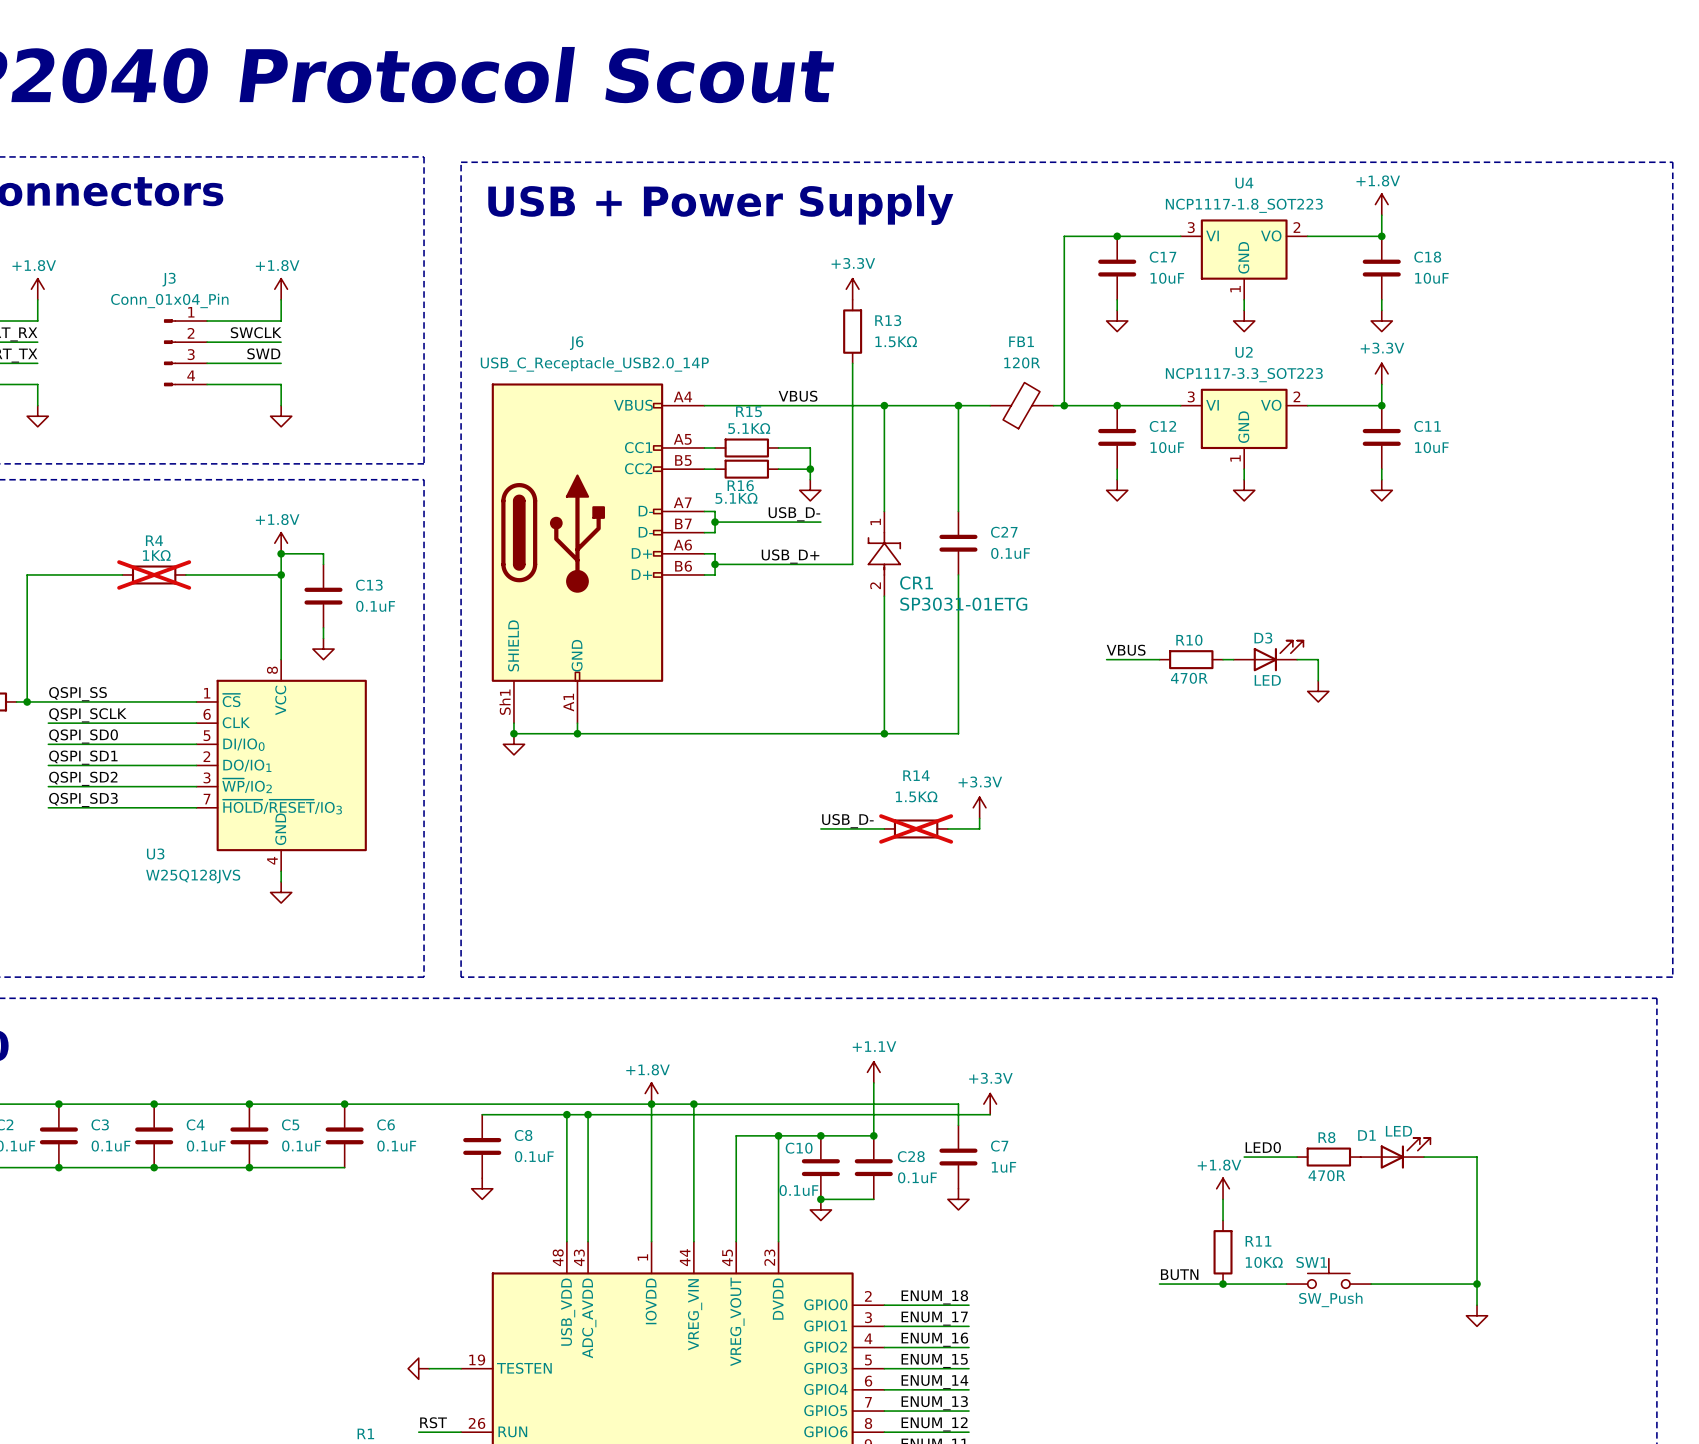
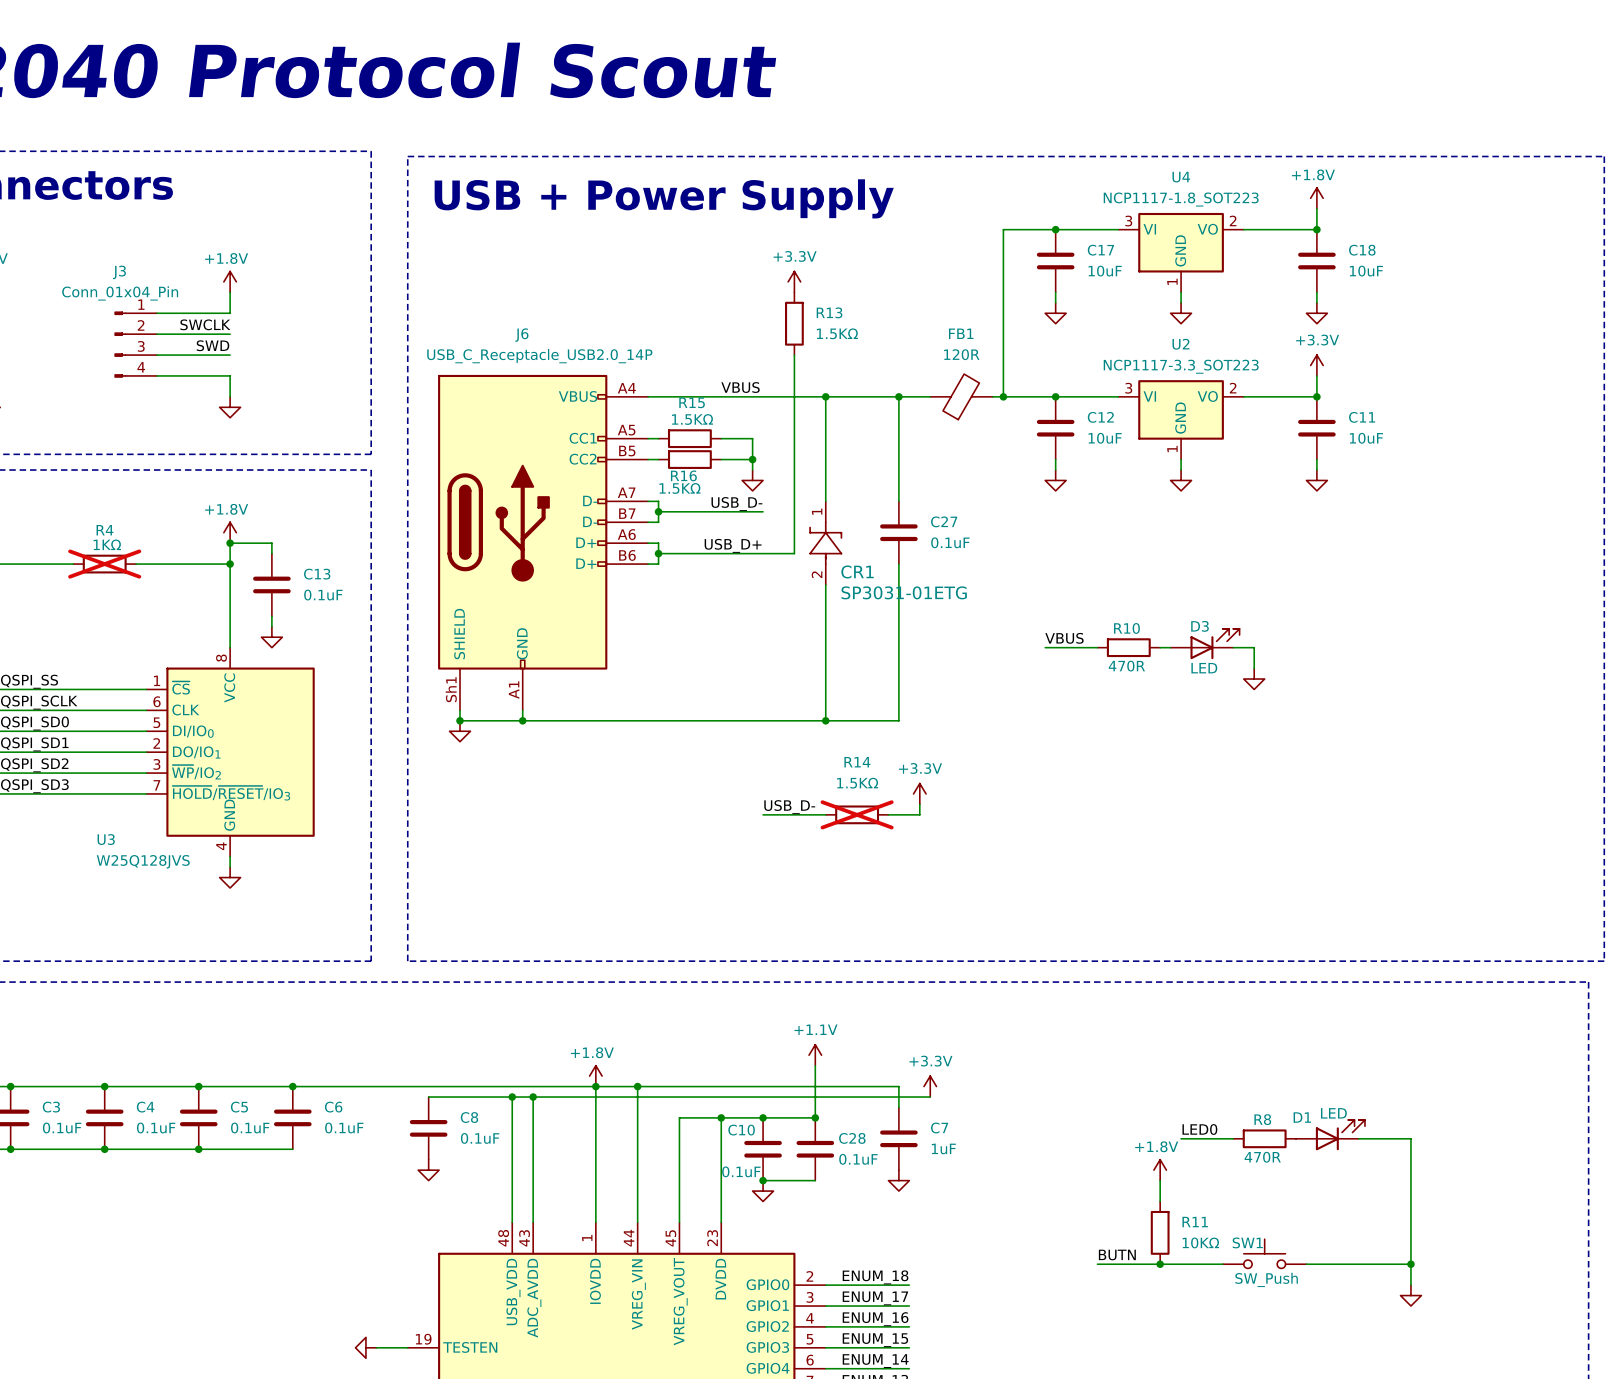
R15 value: 5.1KΩ (749, 428) -> 1.5KΩ (692, 419)
R16 value: 5.1KΩ (736, 498) -> 1.5KΩ (679, 488)

